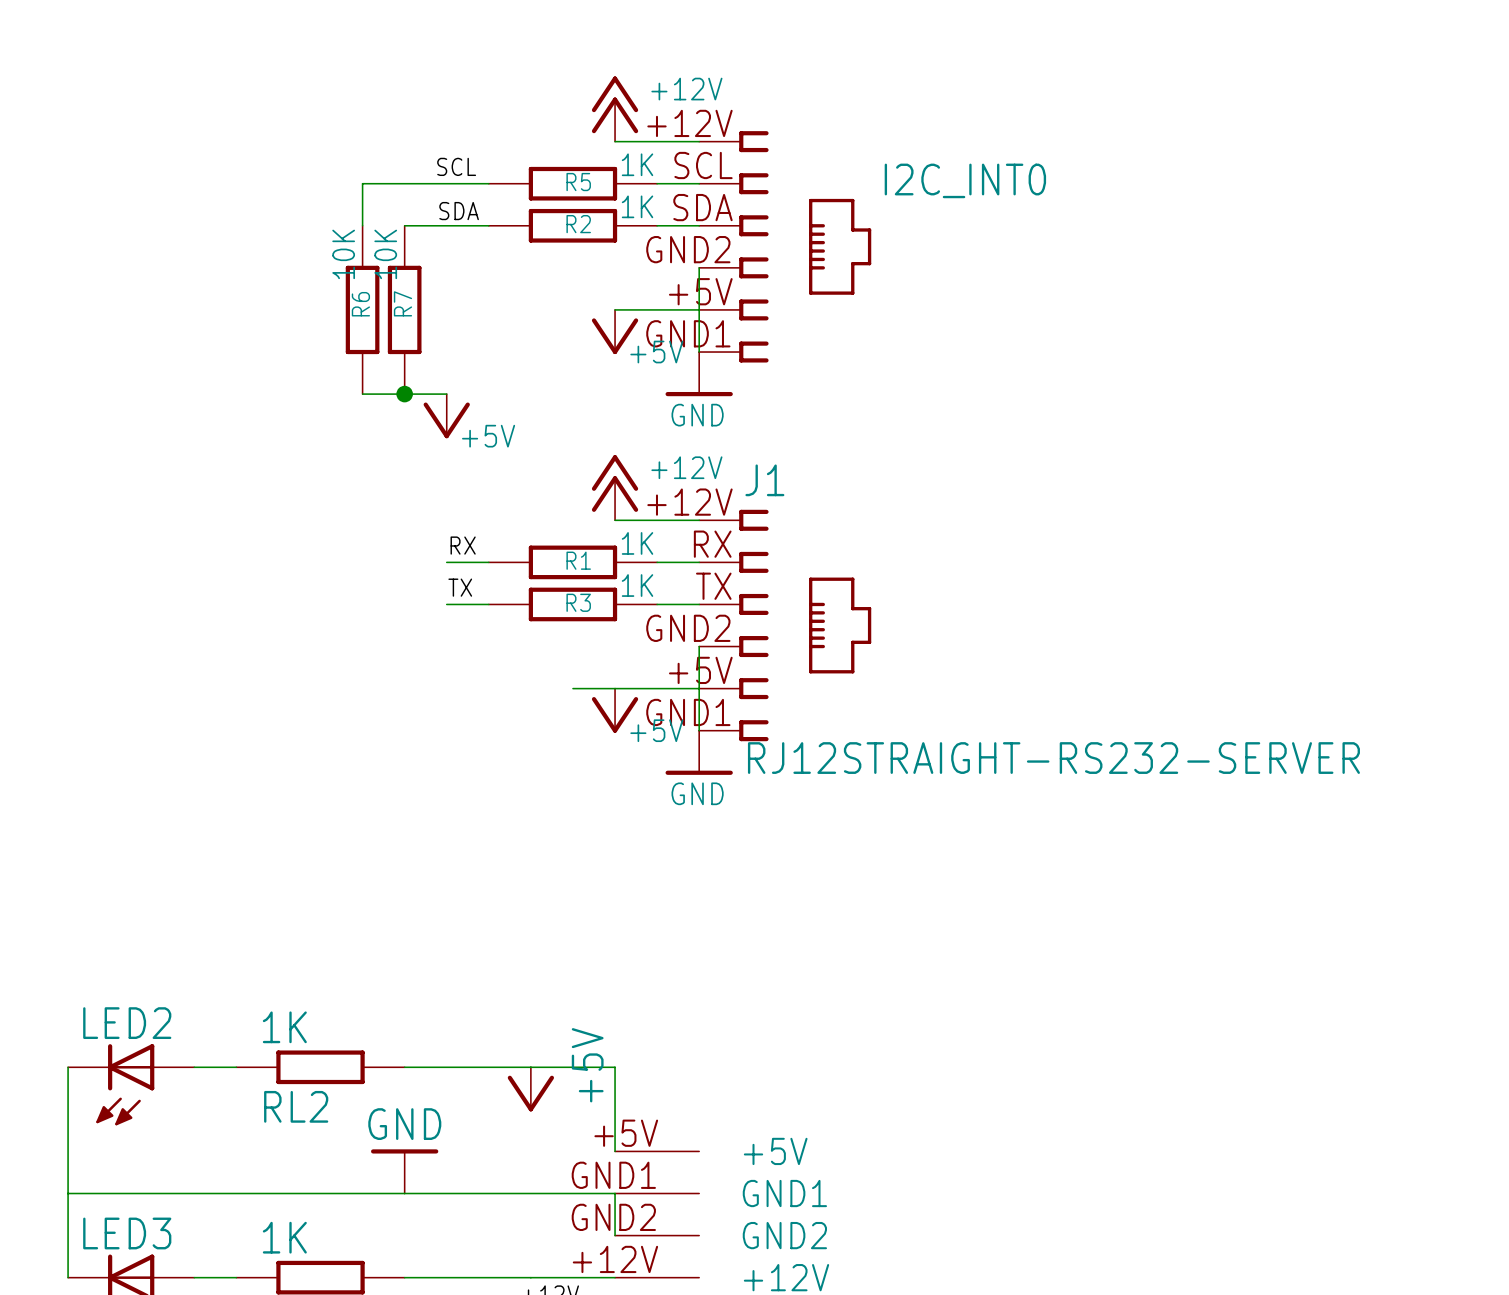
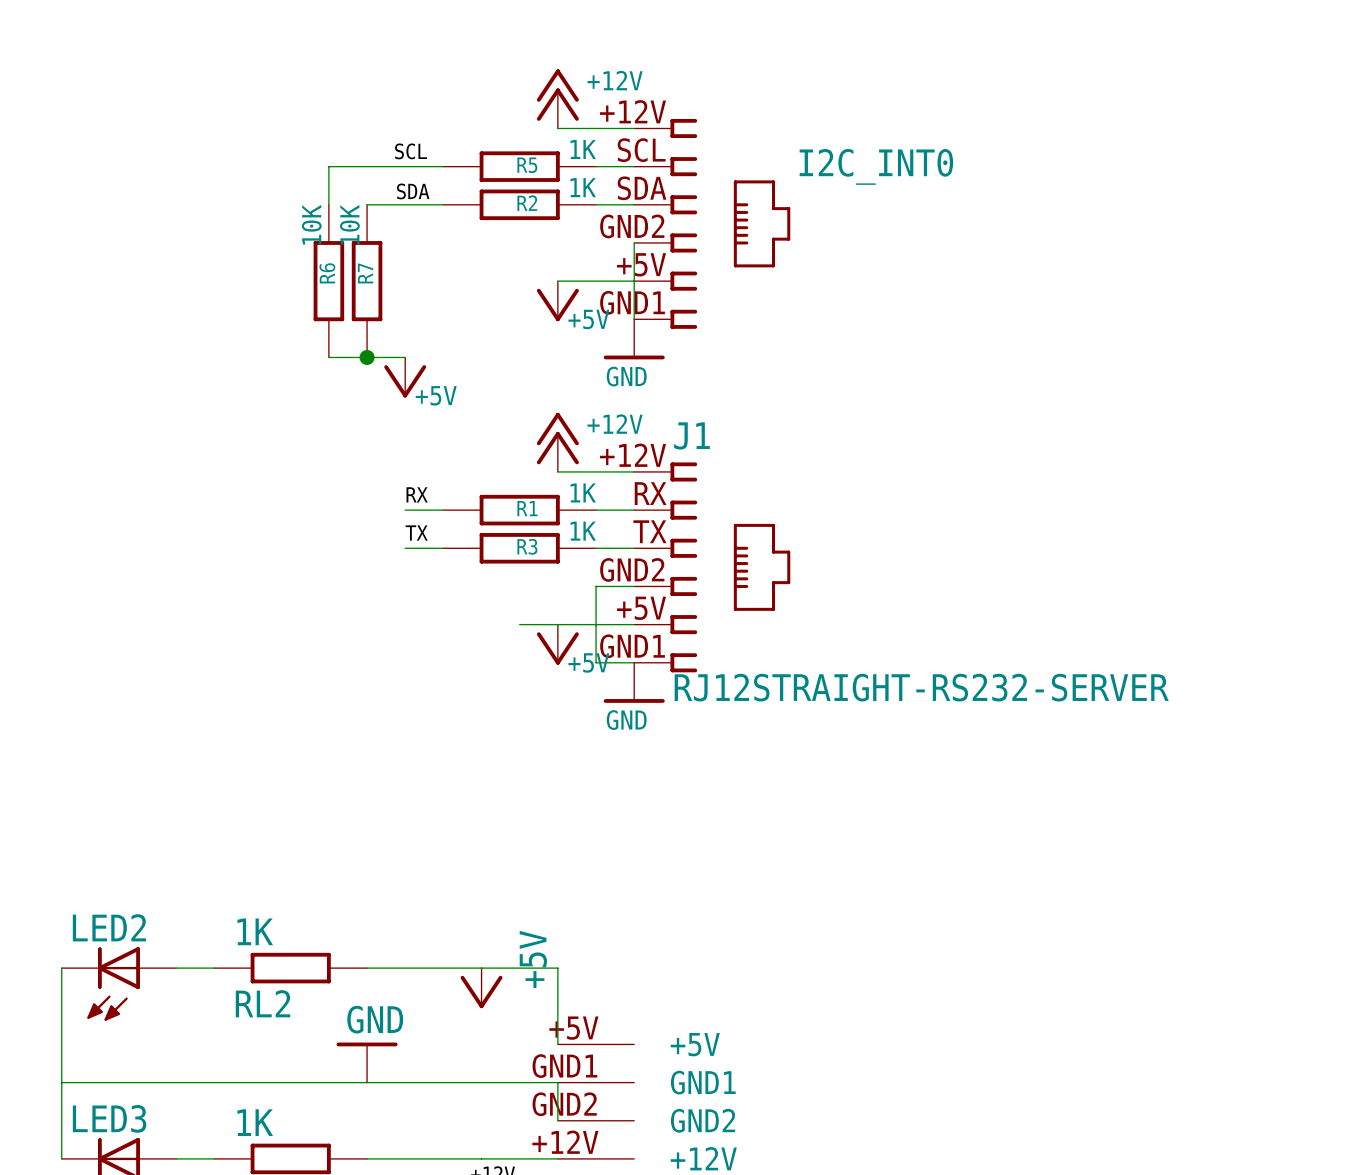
wire: (699, 646) (699, 730) -> (634, 586) (596, 586) (596, 662) (634, 662)

